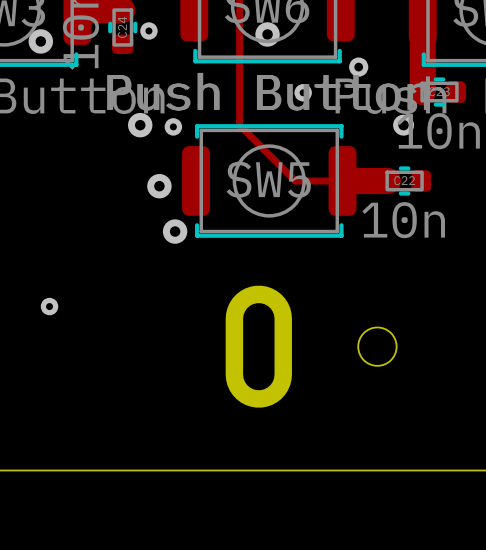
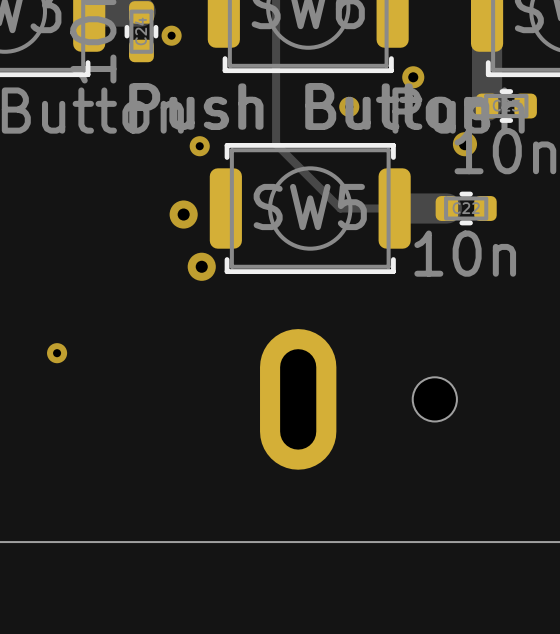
via: (267, 34) -> none
via: (40, 41) -> none
via: (140, 125) -> none

